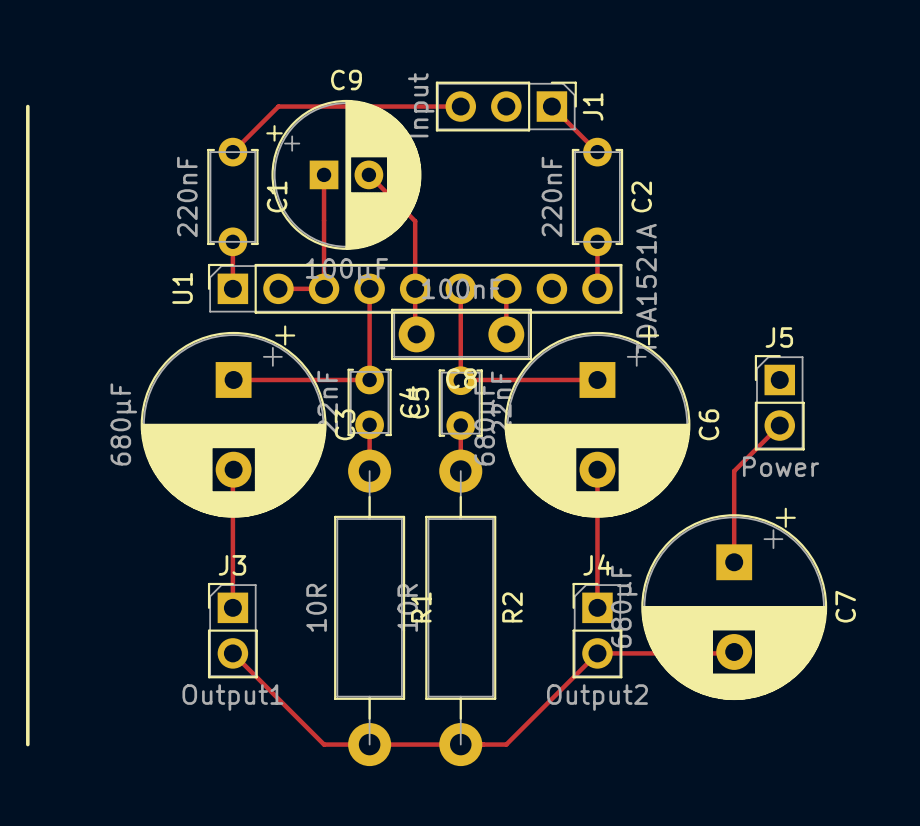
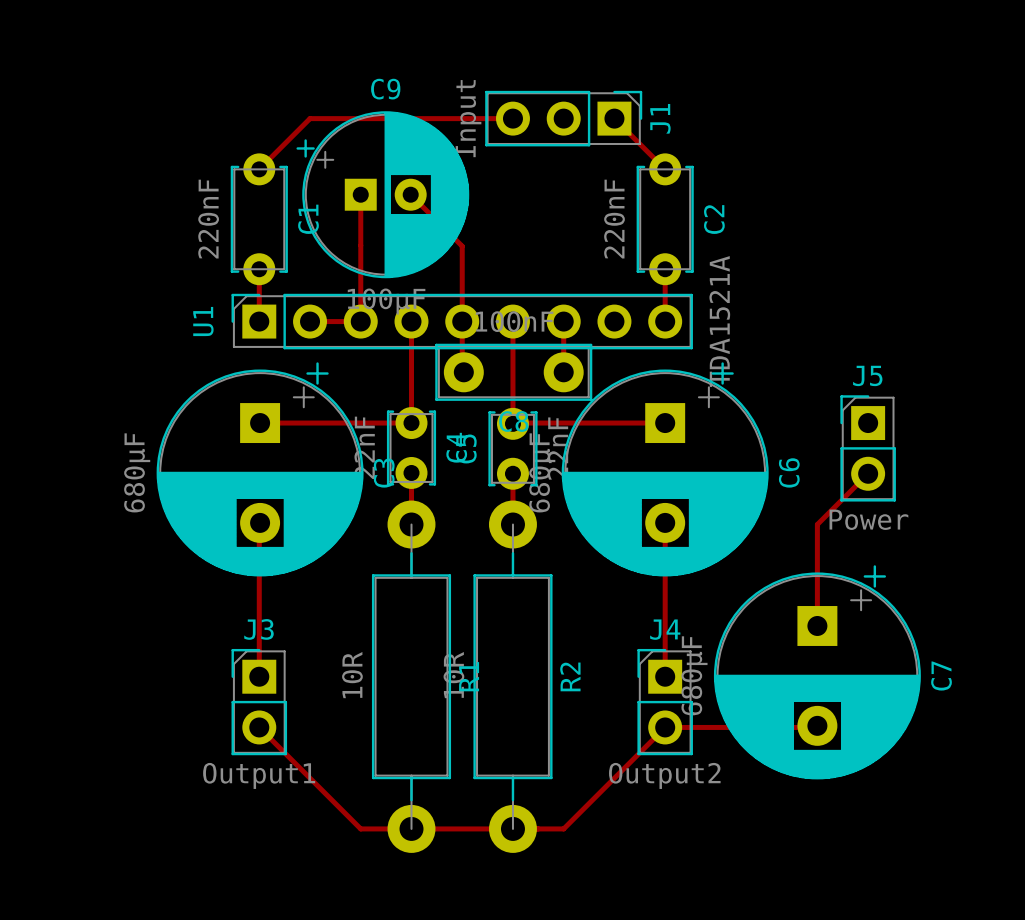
line: (27, 106) (27, 744) -> none

